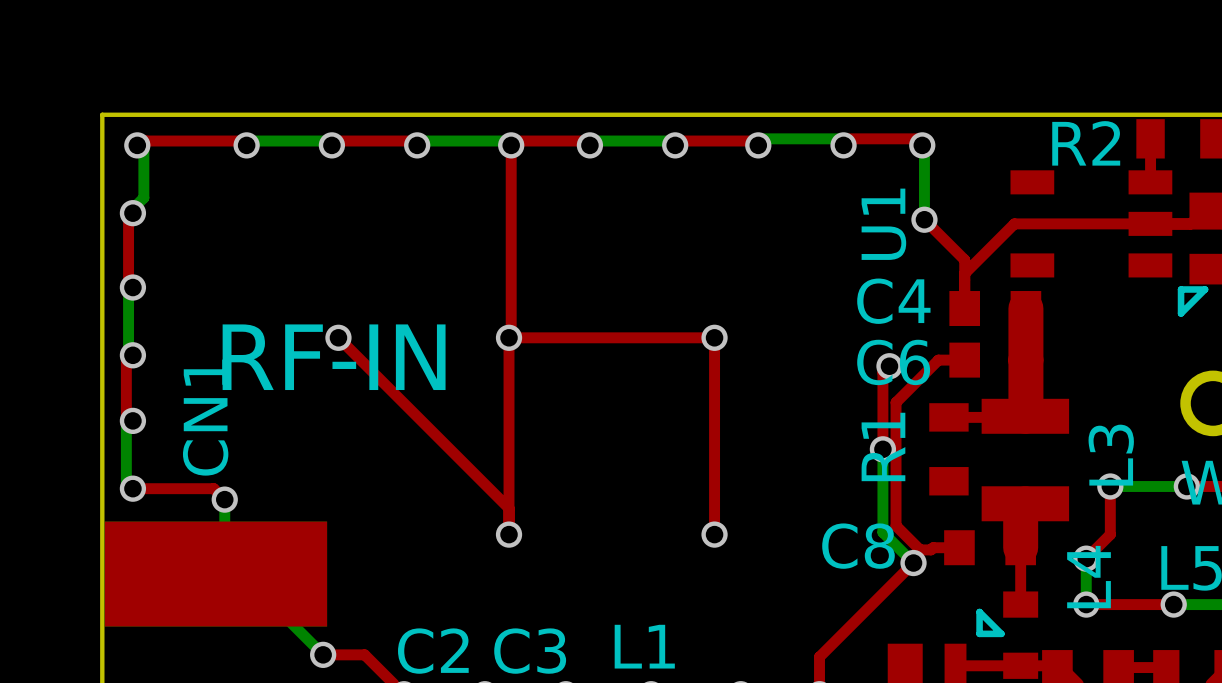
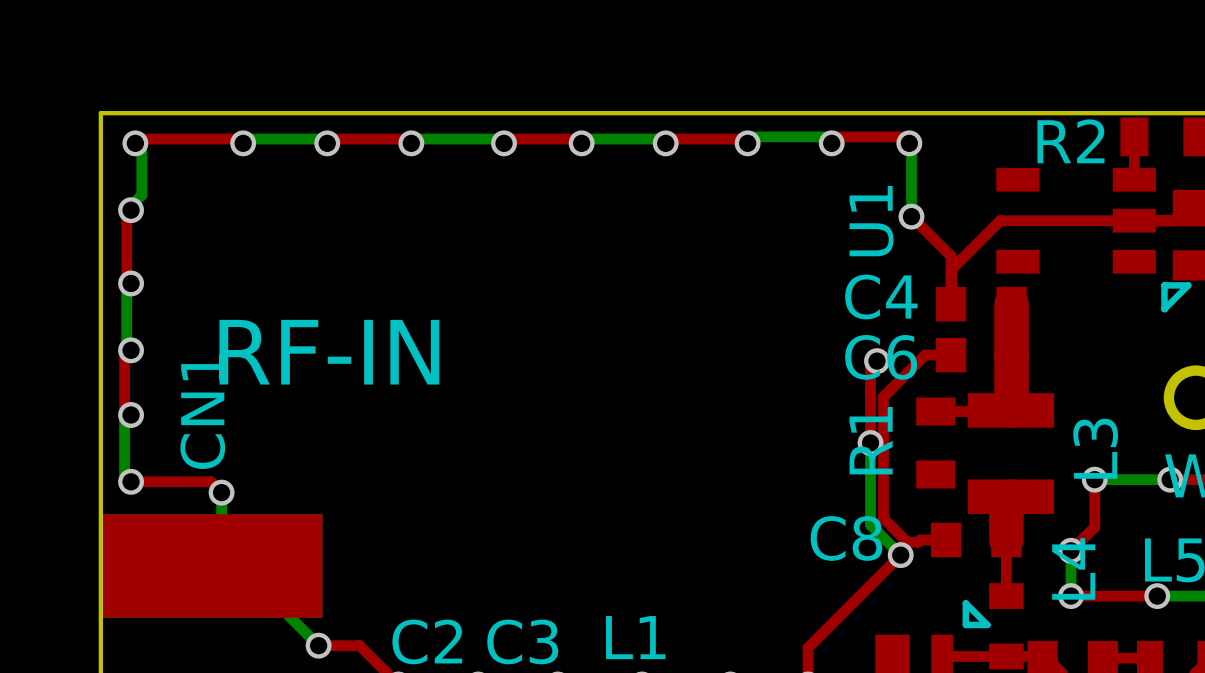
top track: (511, 145) (511, 335) (509, 337) -> none
top track: (338, 337) (509, 508) -> none
via: (338, 337) -> none
top track: (509, 337) (714, 337) (714, 534) -> none
top track: (509, 337) (509, 534) -> none
via: (509, 337) -> none
via: (714, 337) -> none
via: (509, 534) -> none
via: (714, 534) -> none

